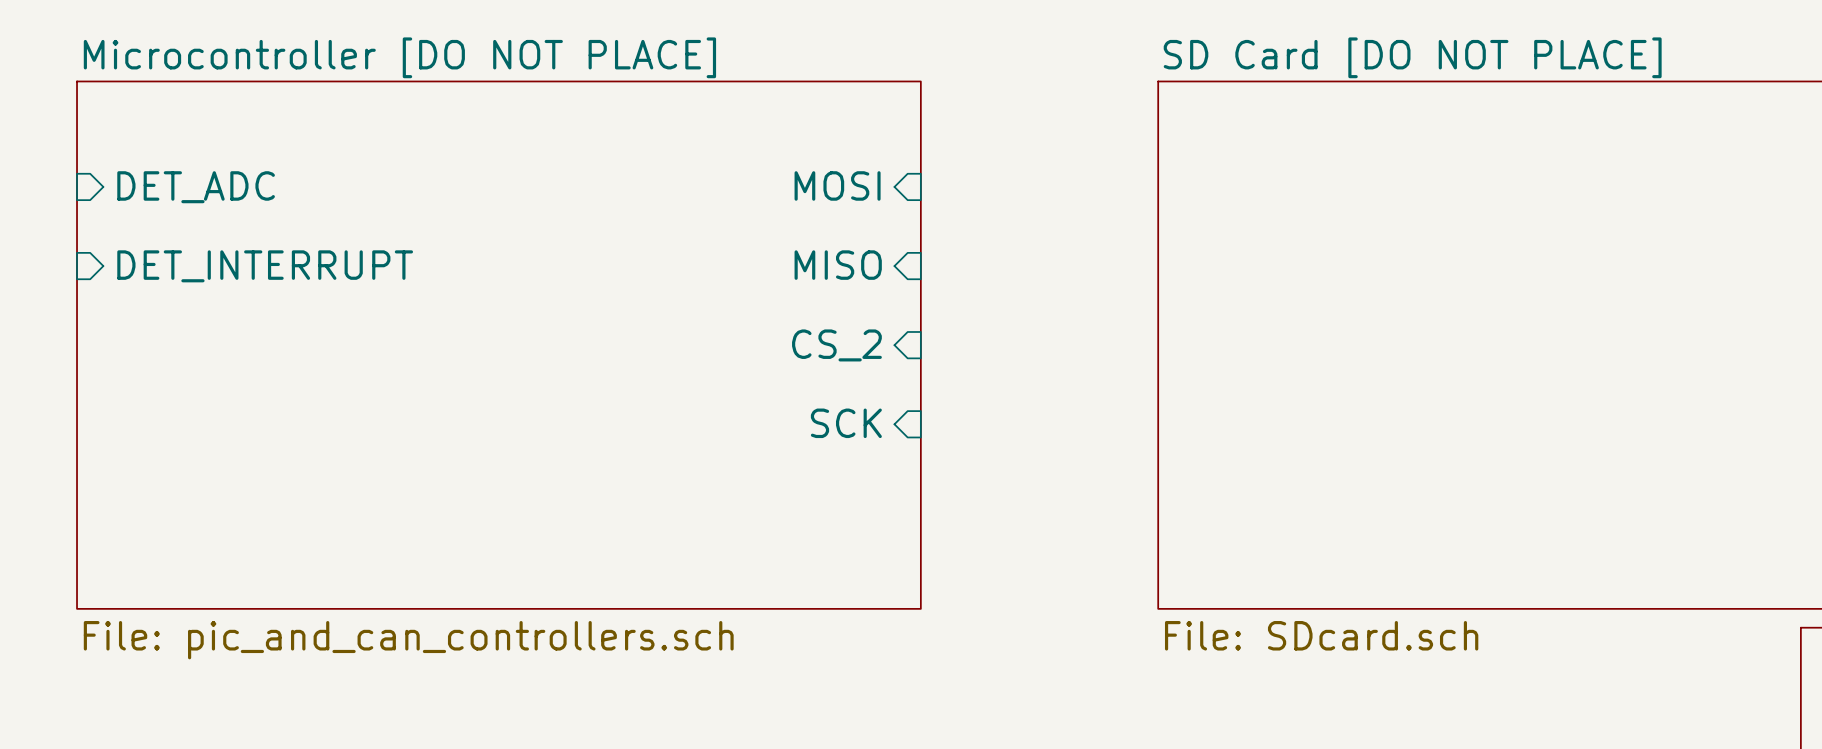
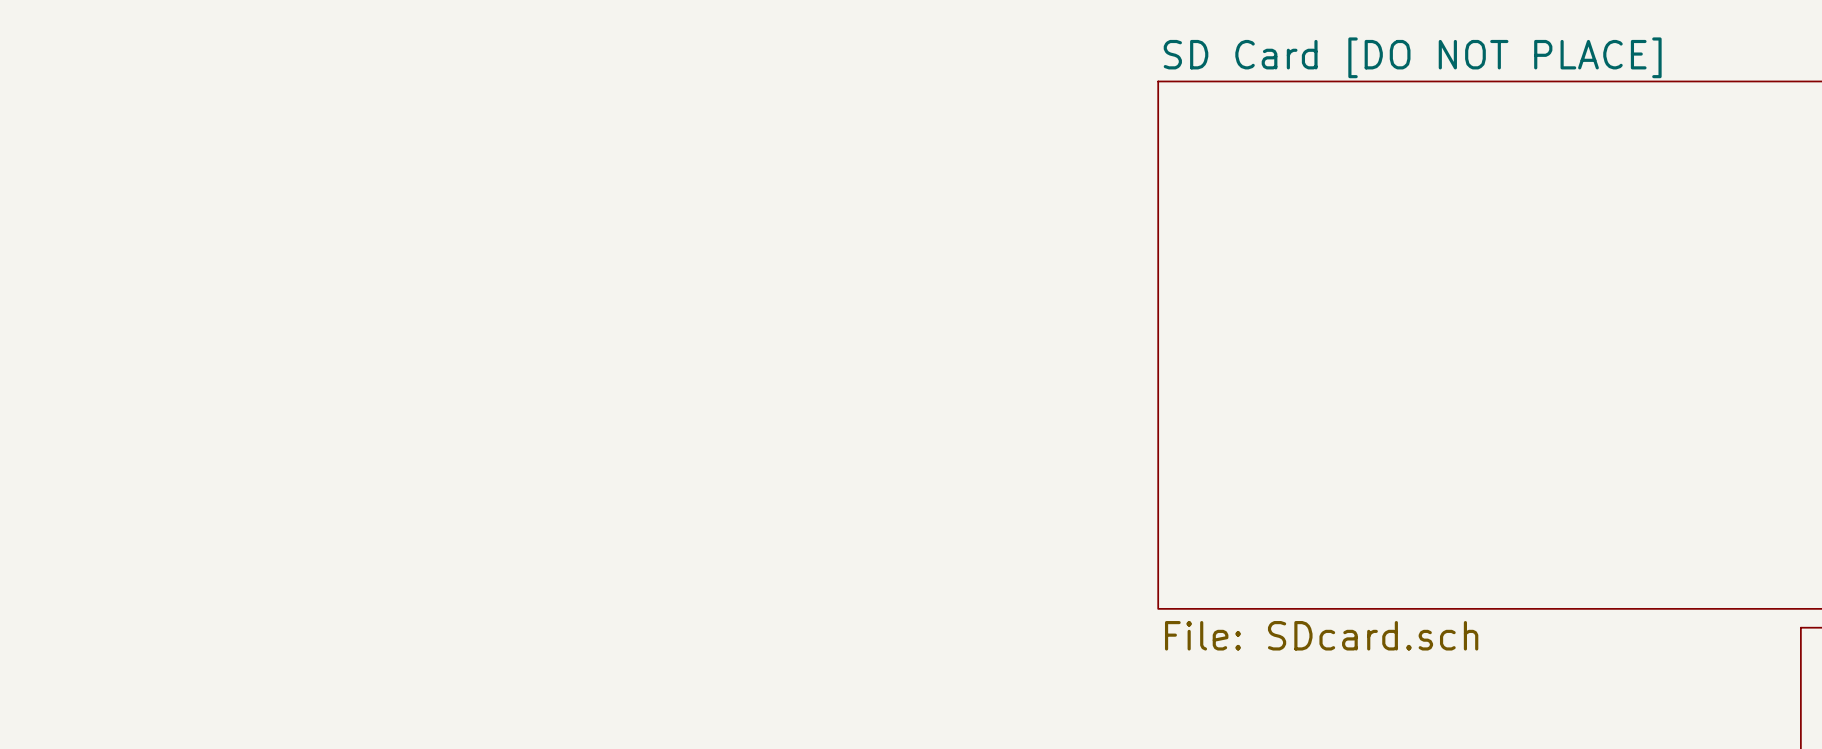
sheet pin: MOSI (837, 185) -> none
sheet pin: DET_ADC (196, 187) -> none
sheet pin: MISO (838, 265) -> none
sheet pin: DET_INTERRUPT (265, 266) -> none
sheet Microcontroller [DO NOT PLACE]: File: pic_and_can_controllers.sch (498, 345) -> none
sheet pin: CS_2 (836, 345) -> none
sheet pin: SCK (846, 423) -> none

